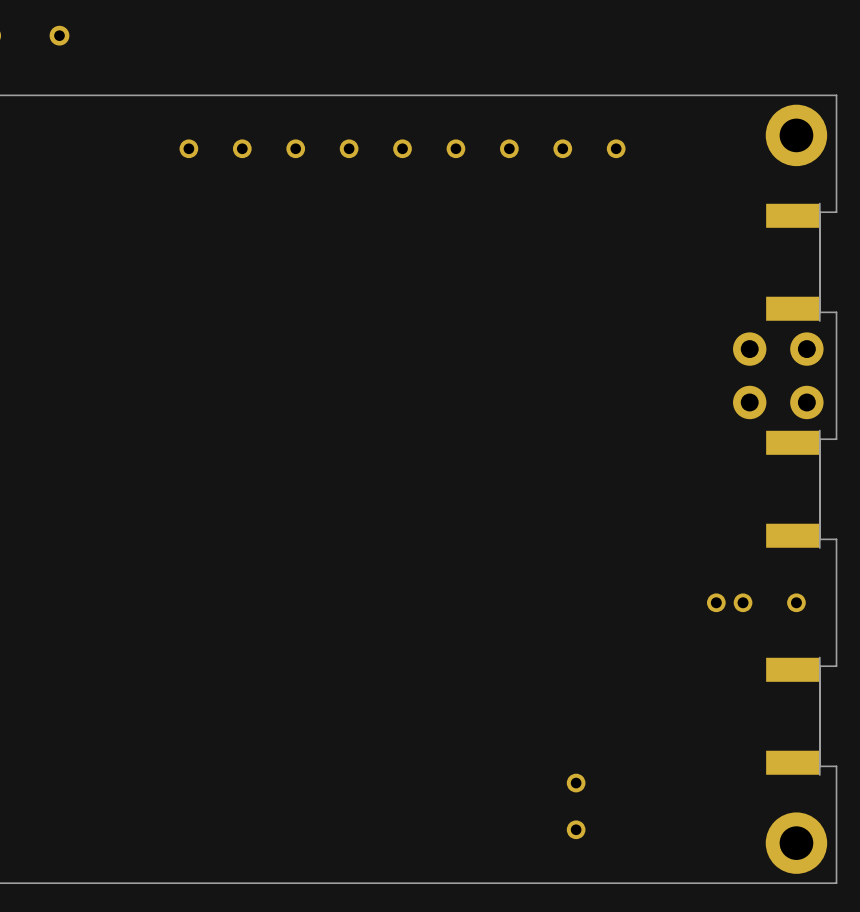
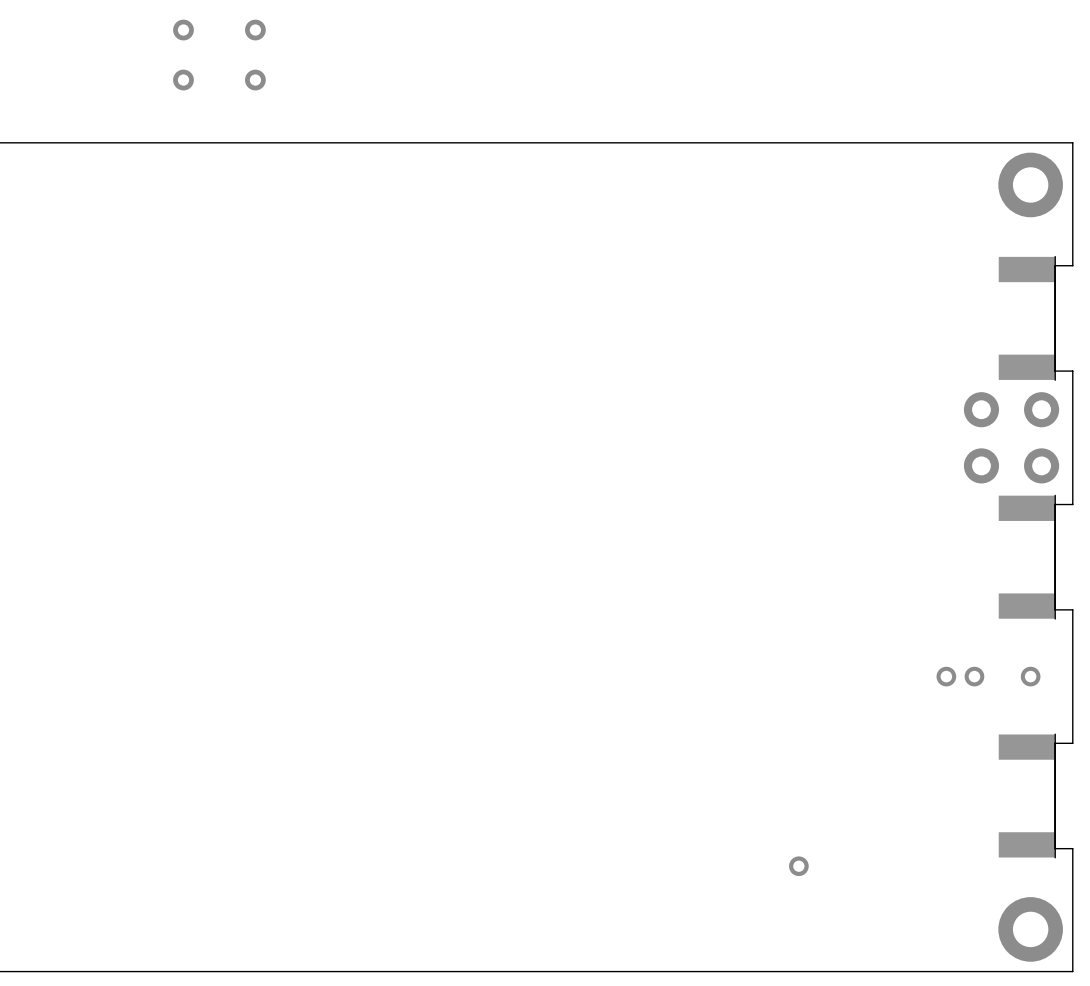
part: (188, 148) -> none
part: (242, 148) -> none
part: (295, 148) -> none
part: (349, 148) -> none
part: (402, 148) -> none
part: (455, 148) -> none
part: (509, 148) -> none
part: (562, 148) -> none
part: (616, 148) -> none
part: (576, 829) -> none

